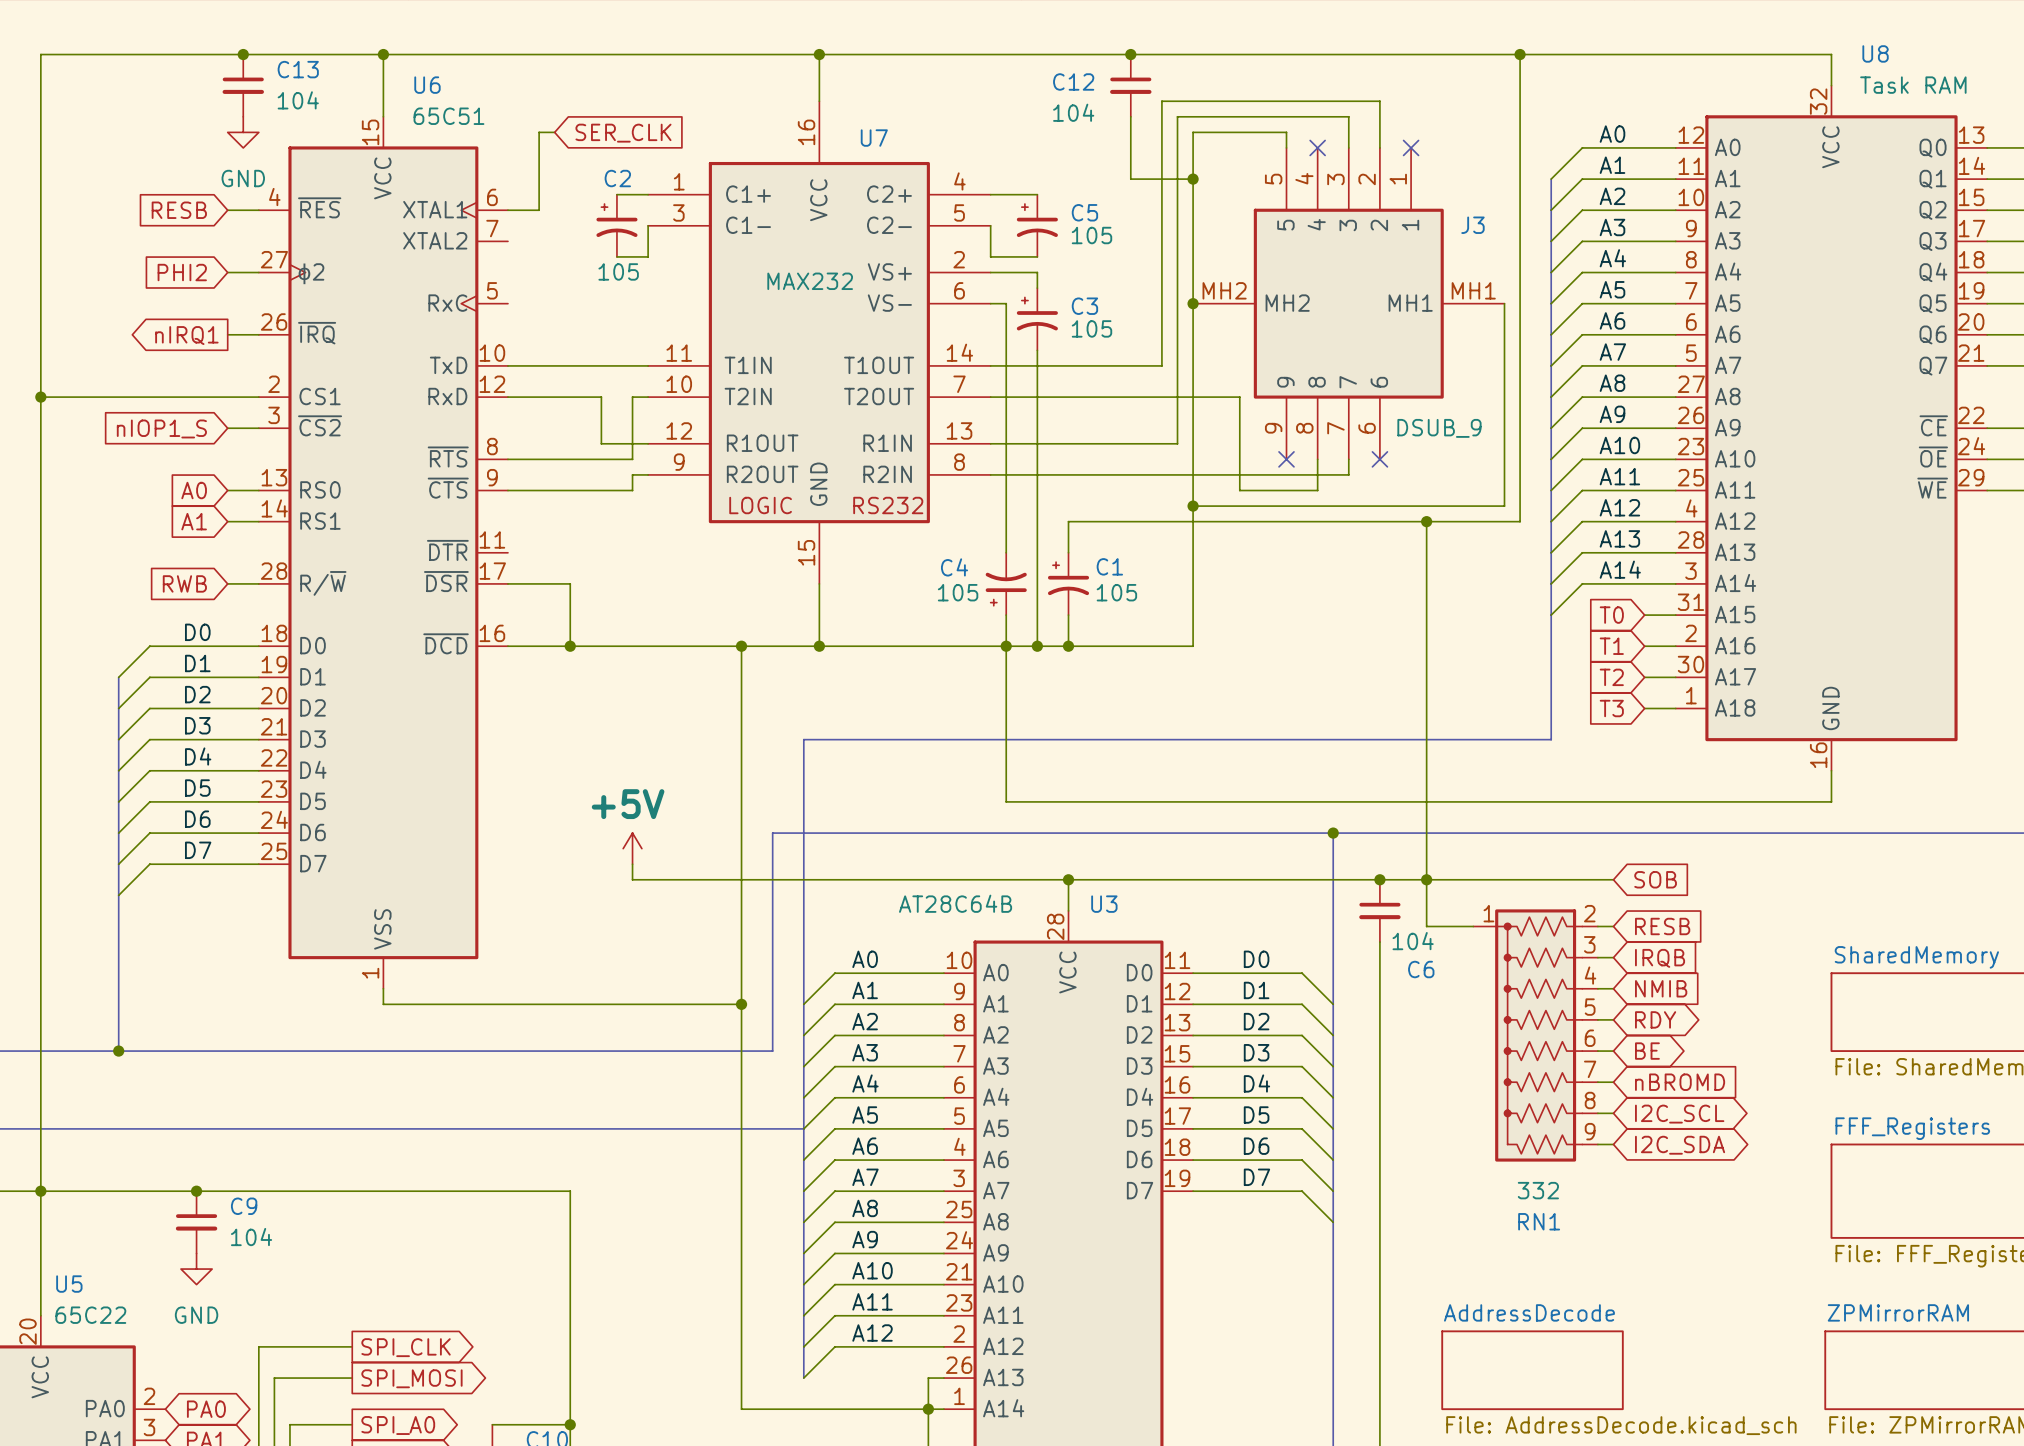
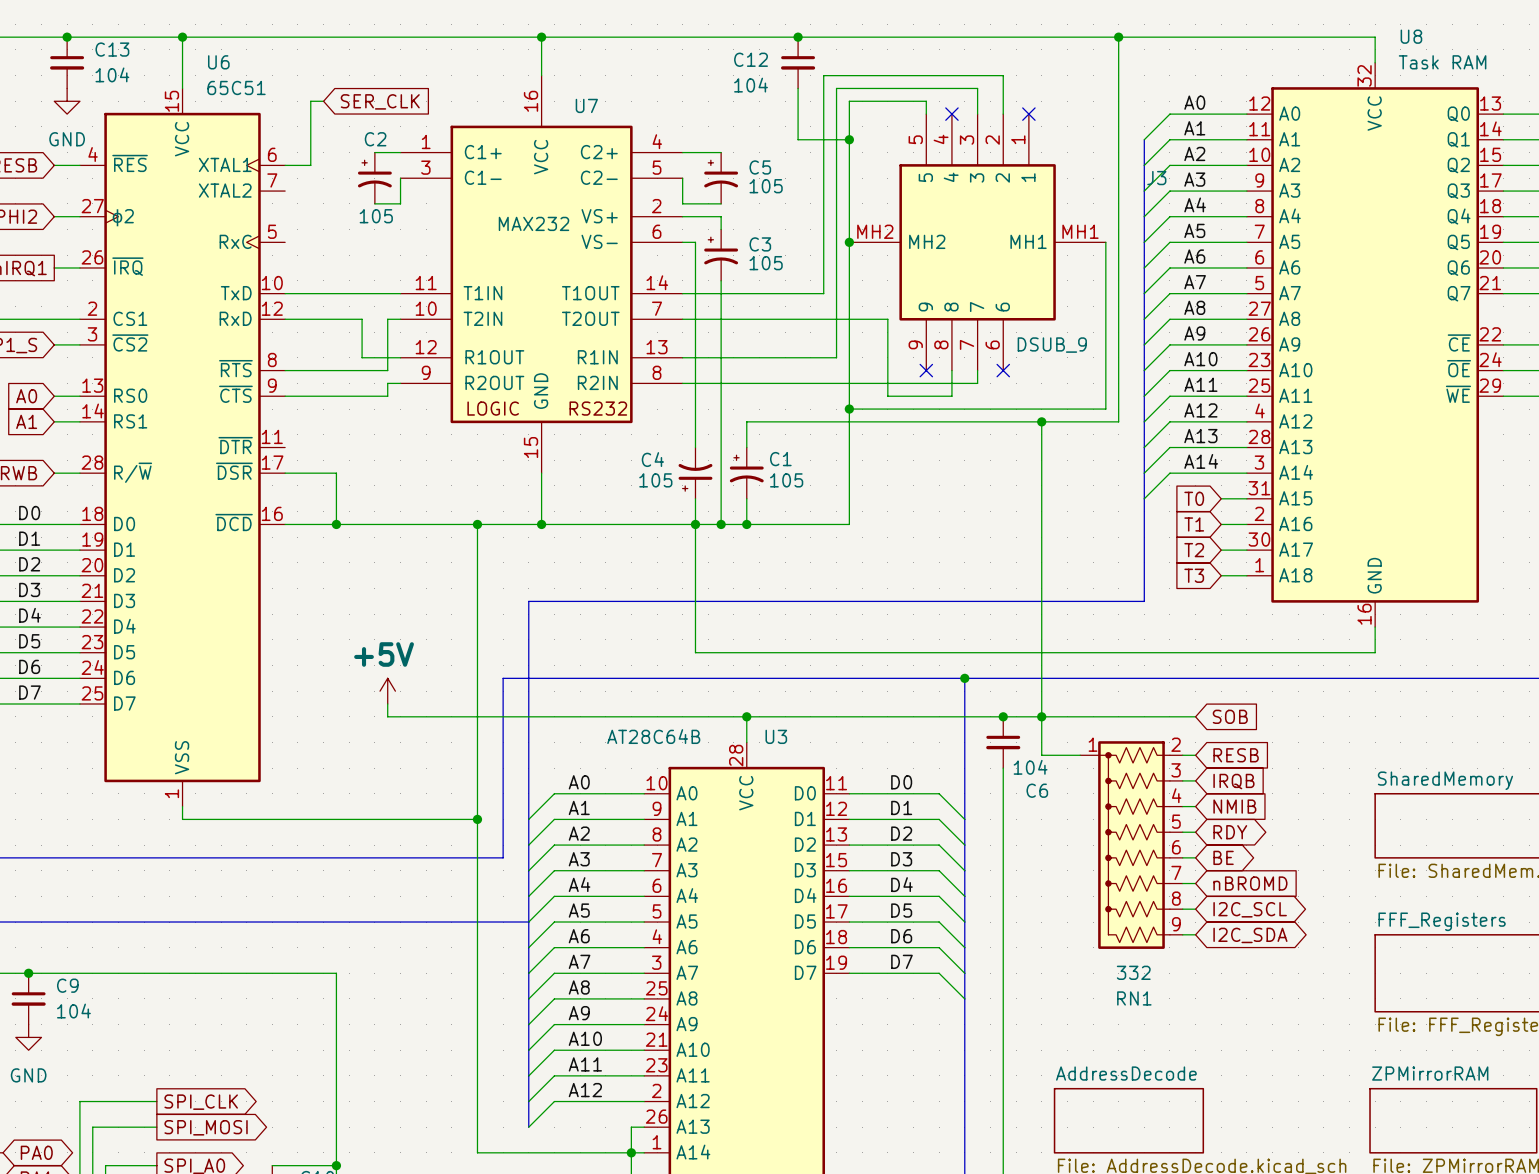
J3 name position: J3 (1472, 225) -> J3 (1156, 178)

